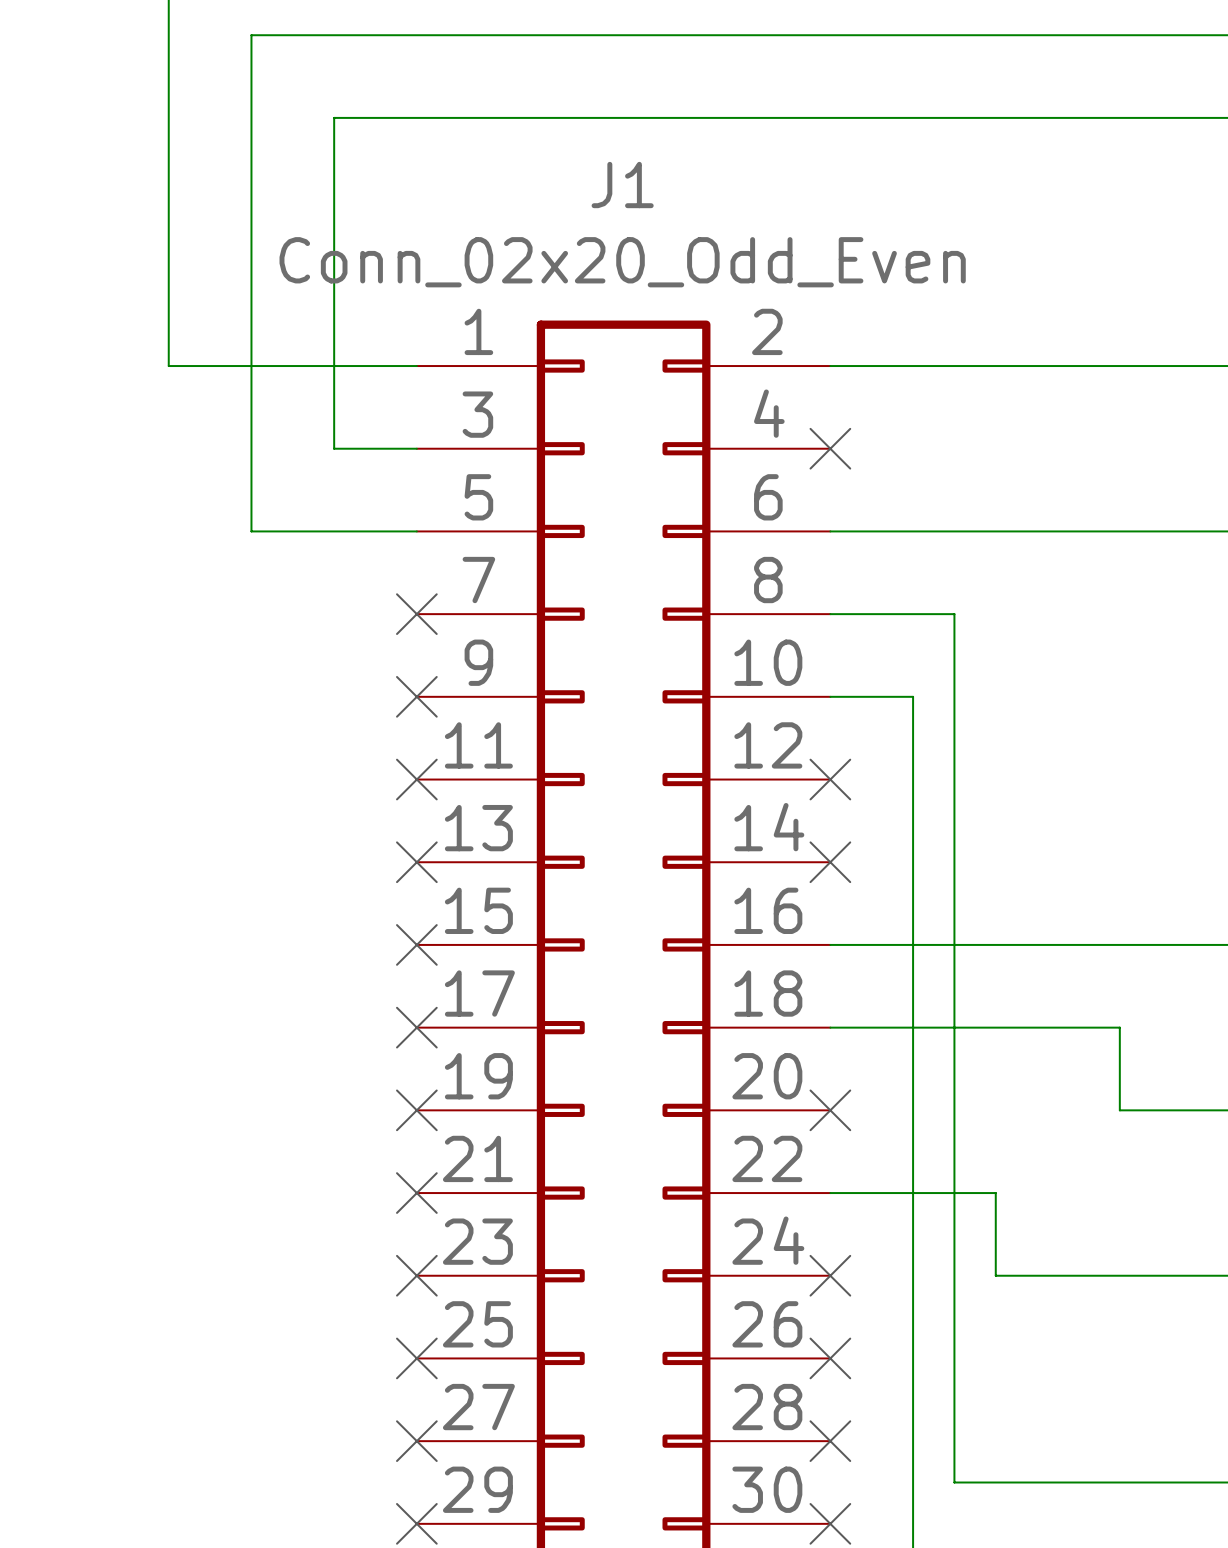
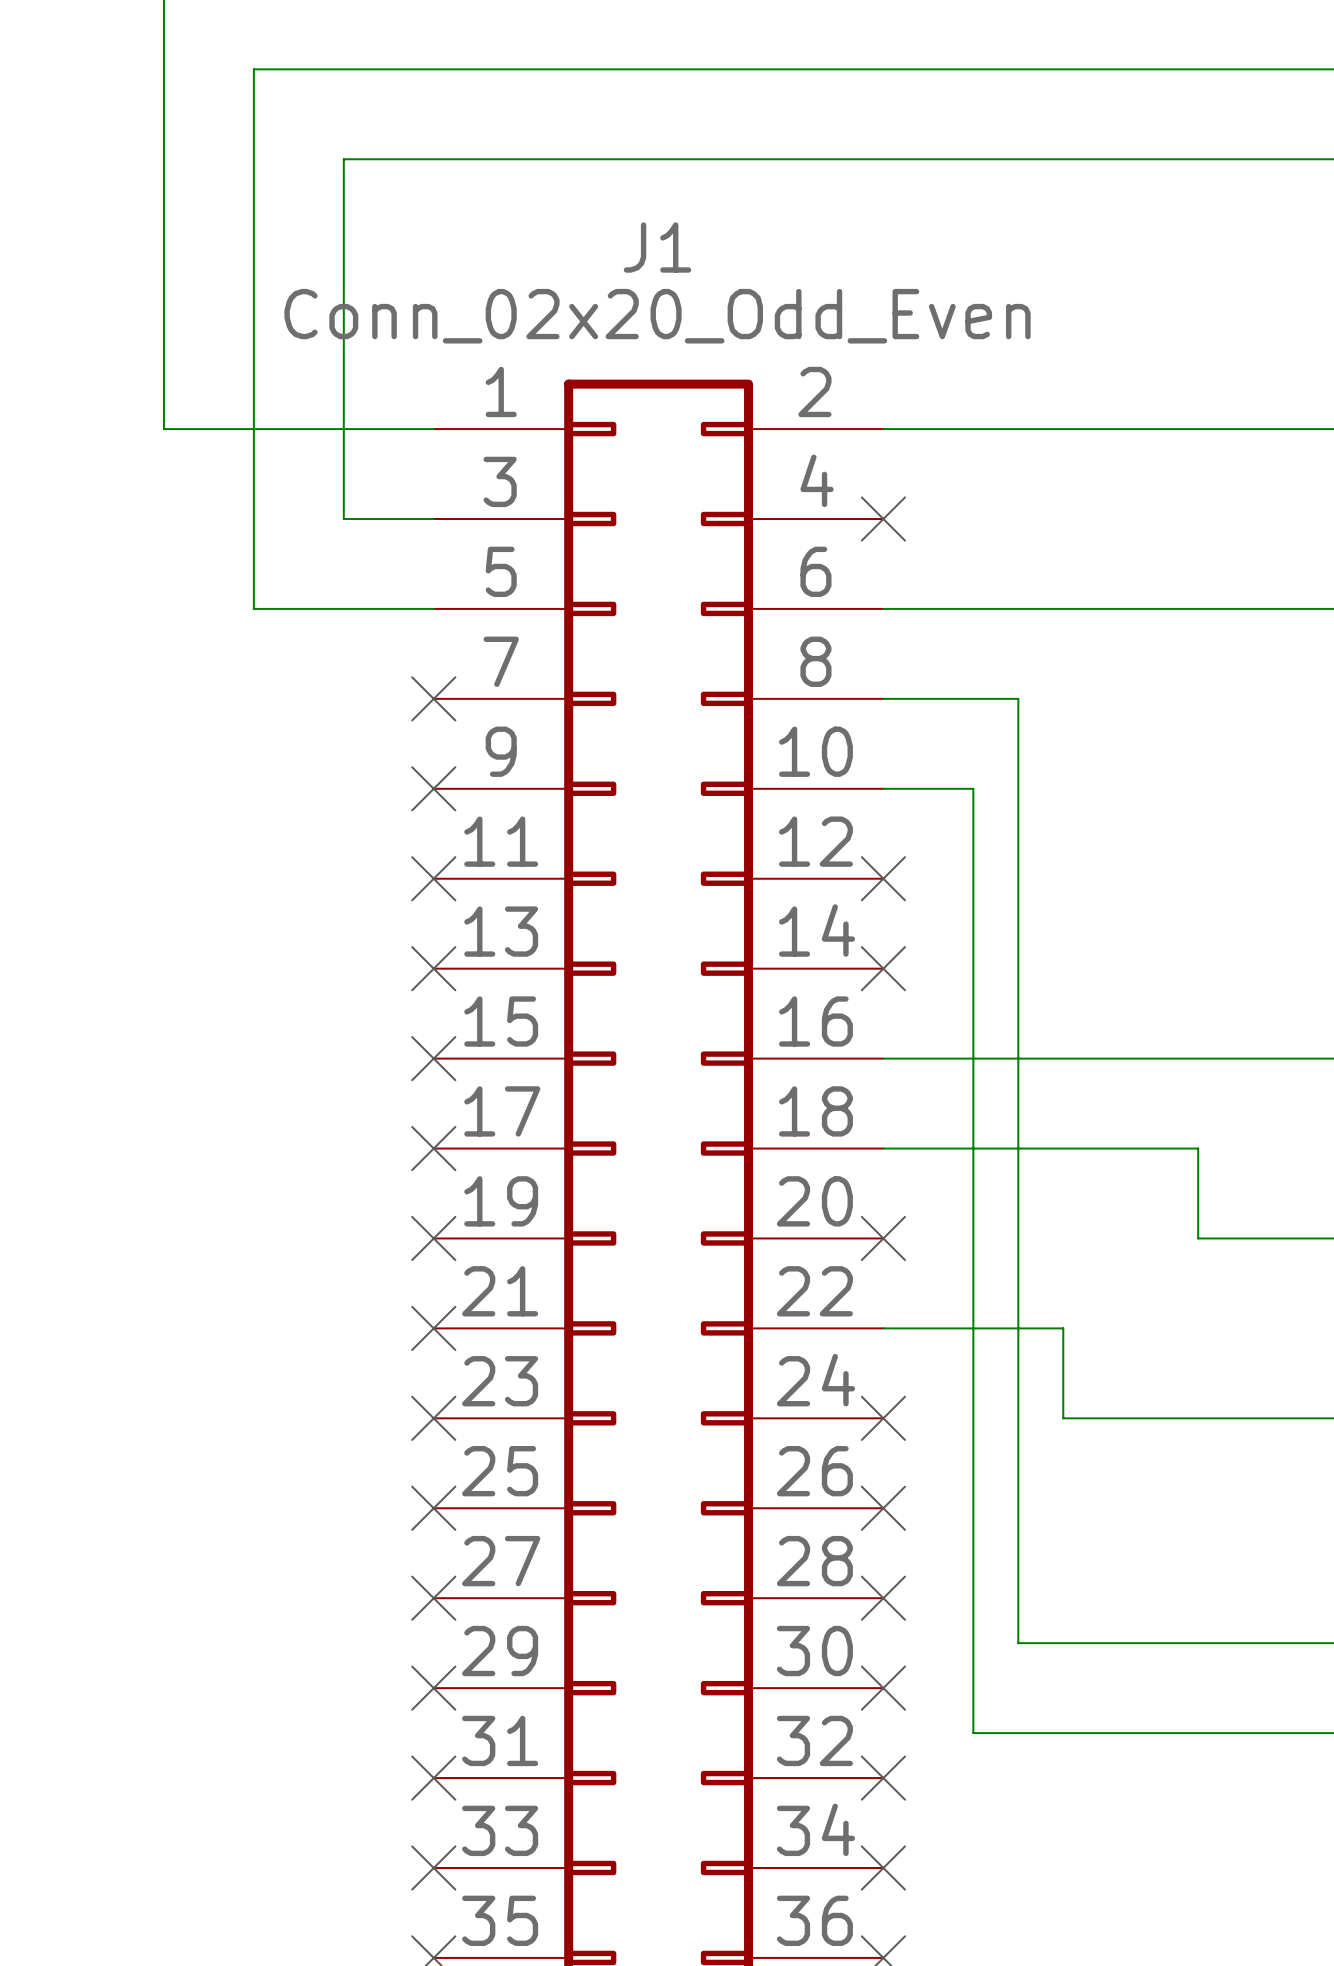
J1 name position: J1 (622, 185) -> J1 (657, 247)

